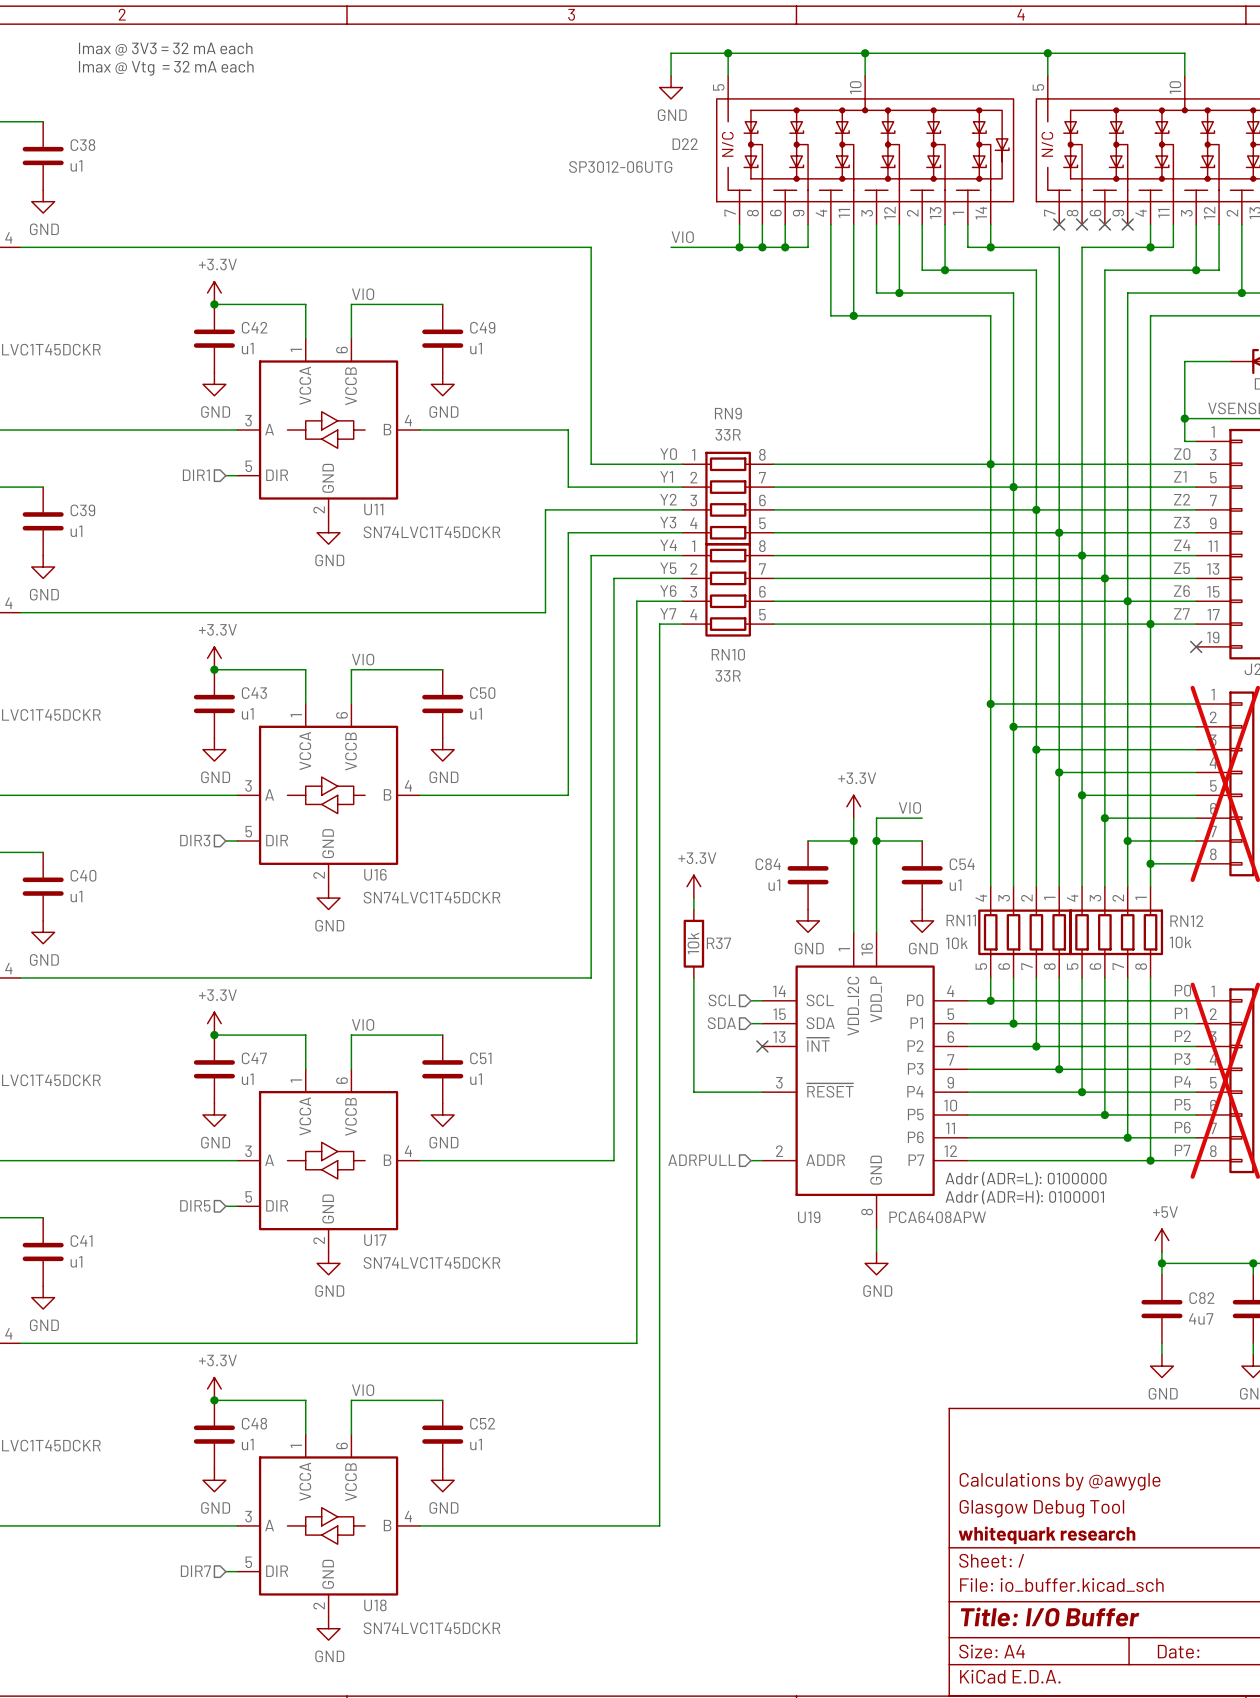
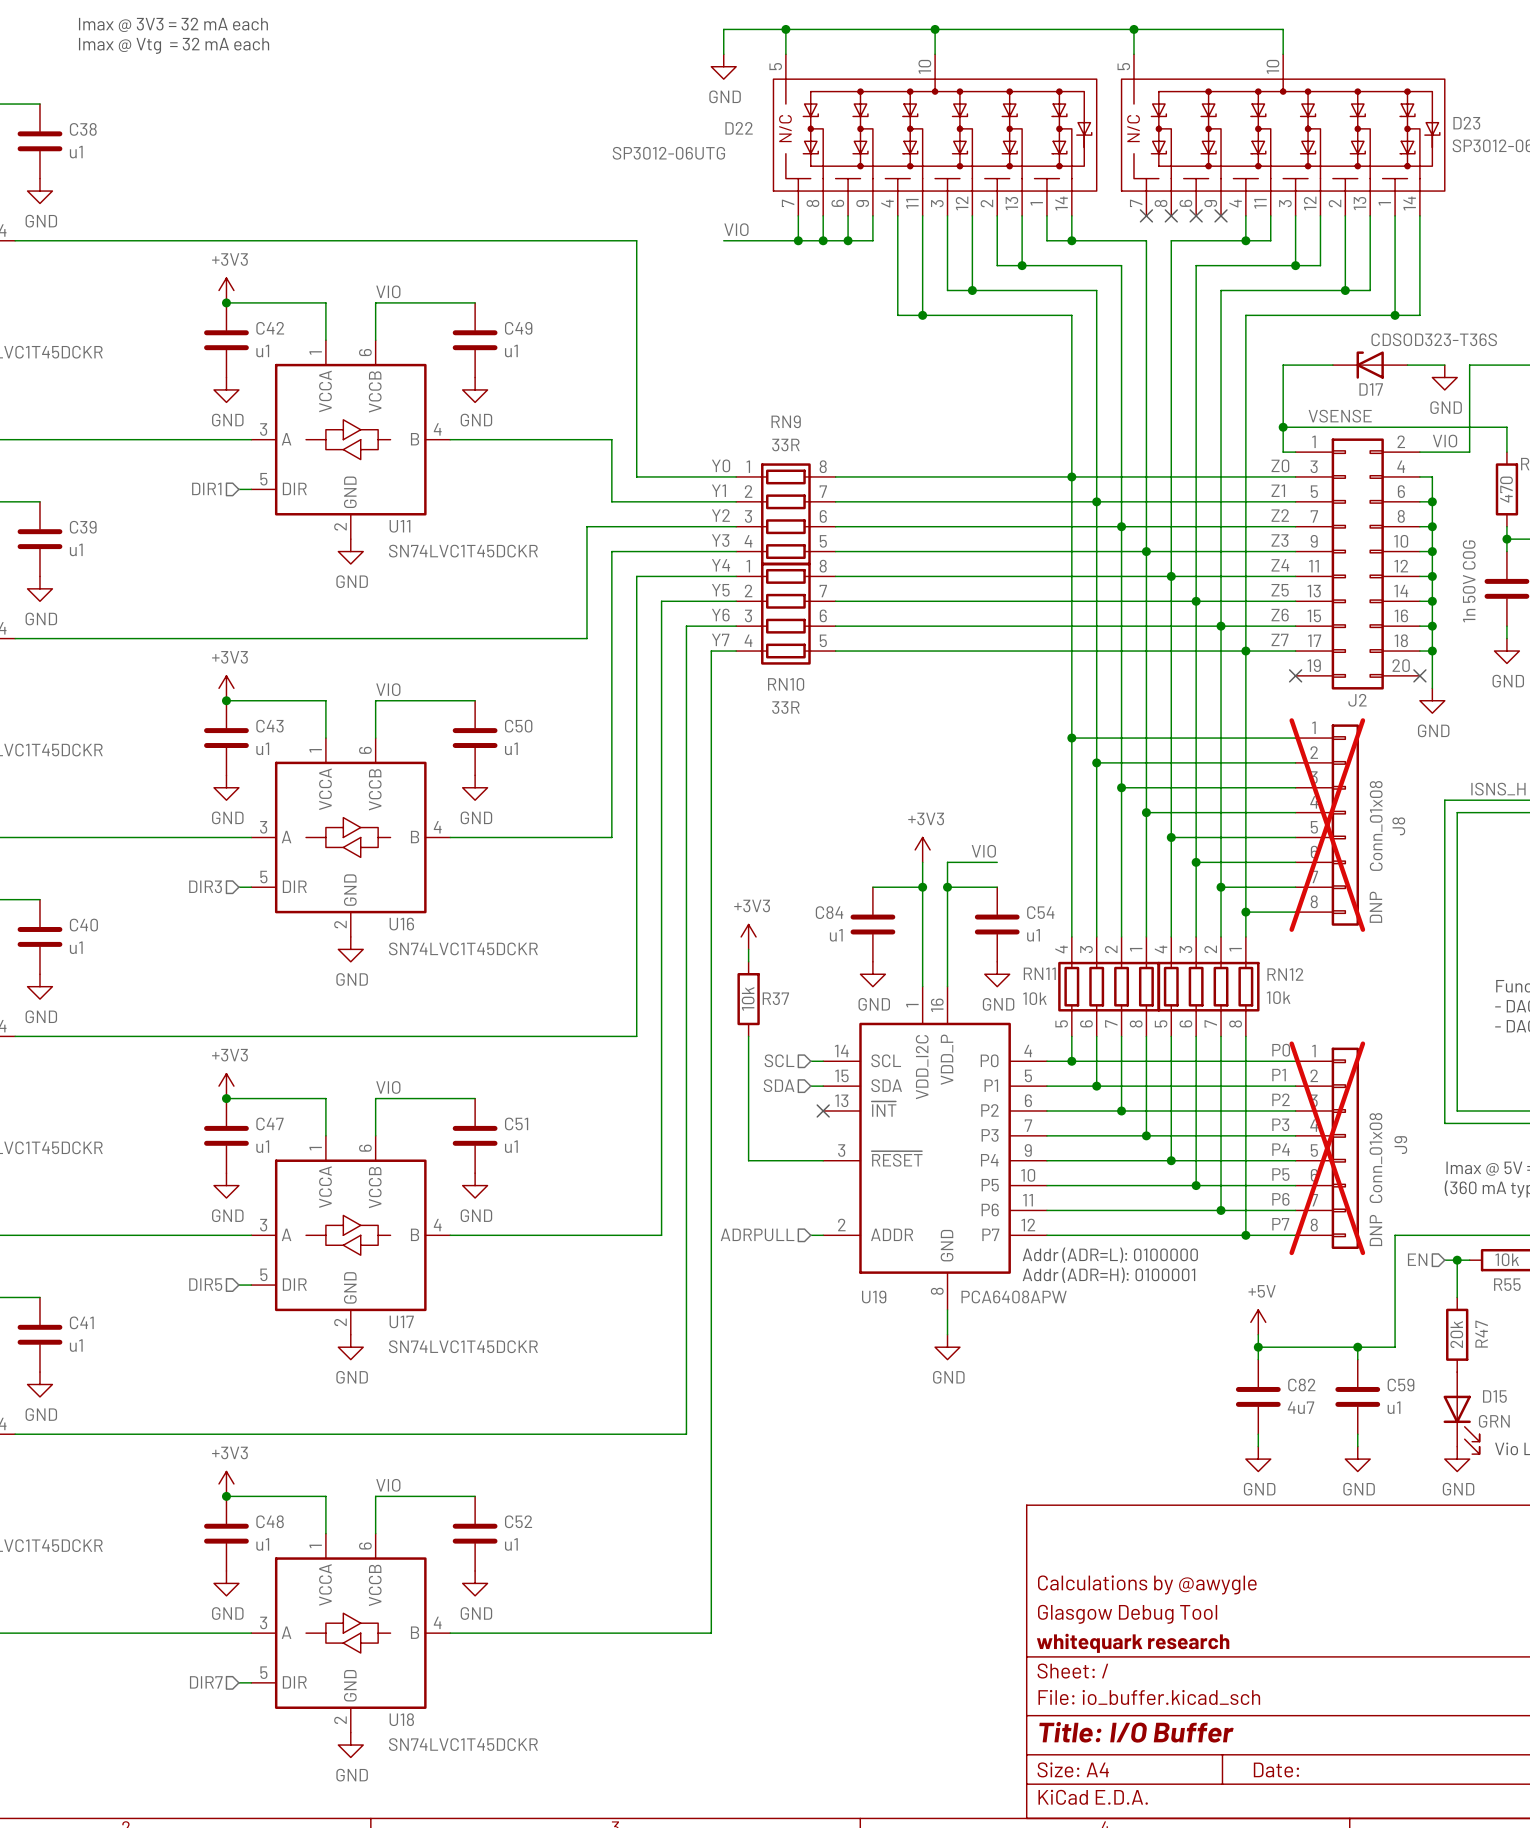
power symbol: +3.3V (214, 293) -> +3V3 (226, 290)
power symbol: +3.3V (214, 658) -> +3V3 (226, 688)
power symbol: +3.3V (853, 806) -> +3V3 (922, 849)
power symbol: +3.3V (693, 886) -> +3V3 (748, 936)
power symbol: +3.3V (214, 1023) -> +3V3 (226, 1086)
power symbol: +3.3V (214, 1388) -> +3V3 (226, 1483)

